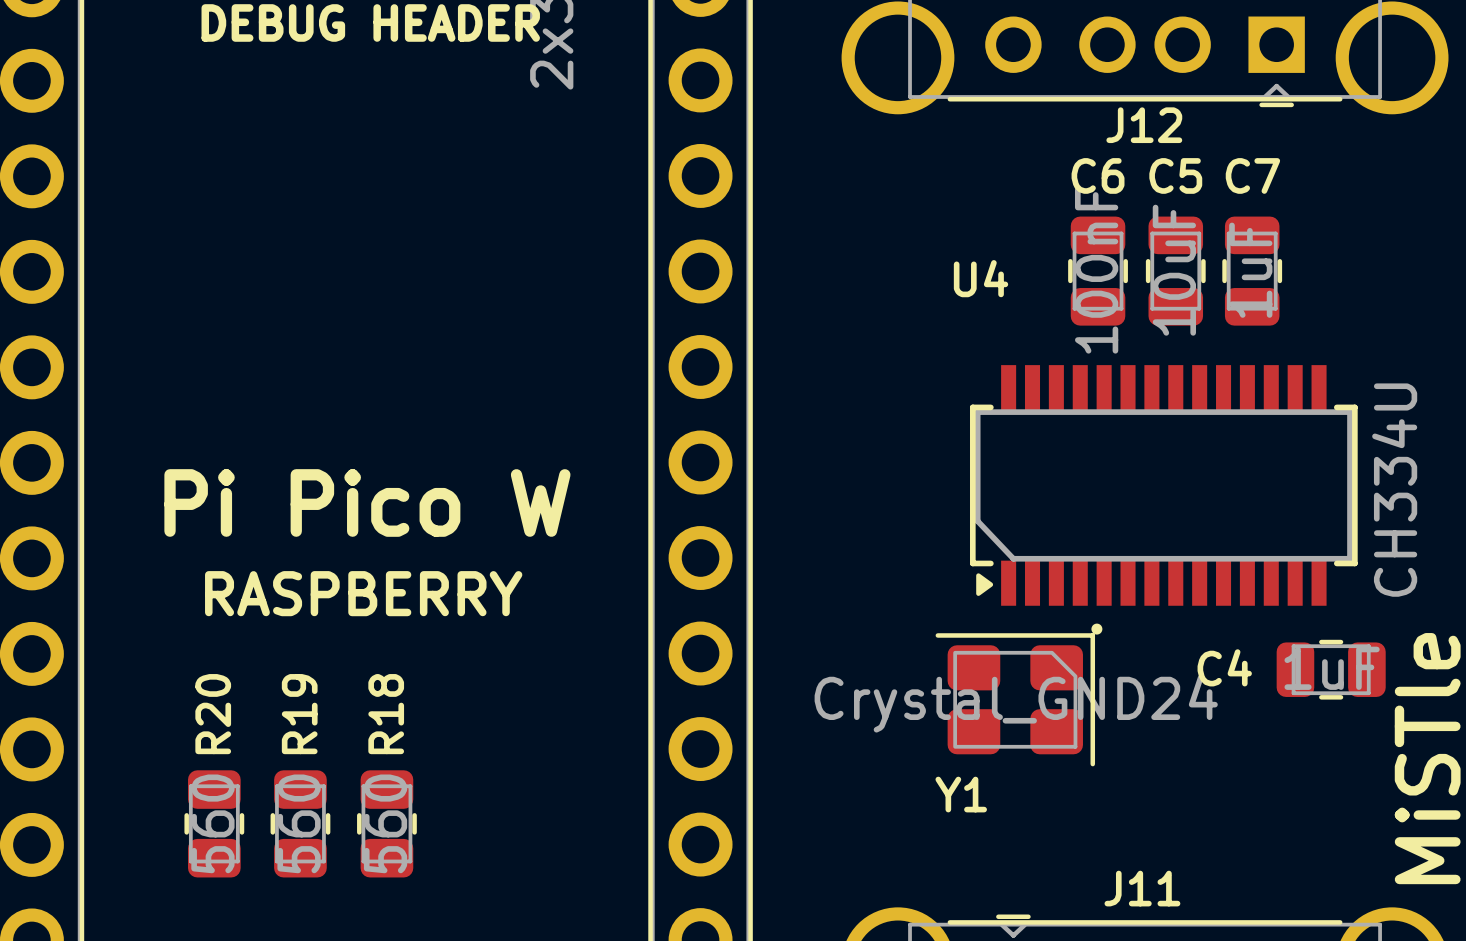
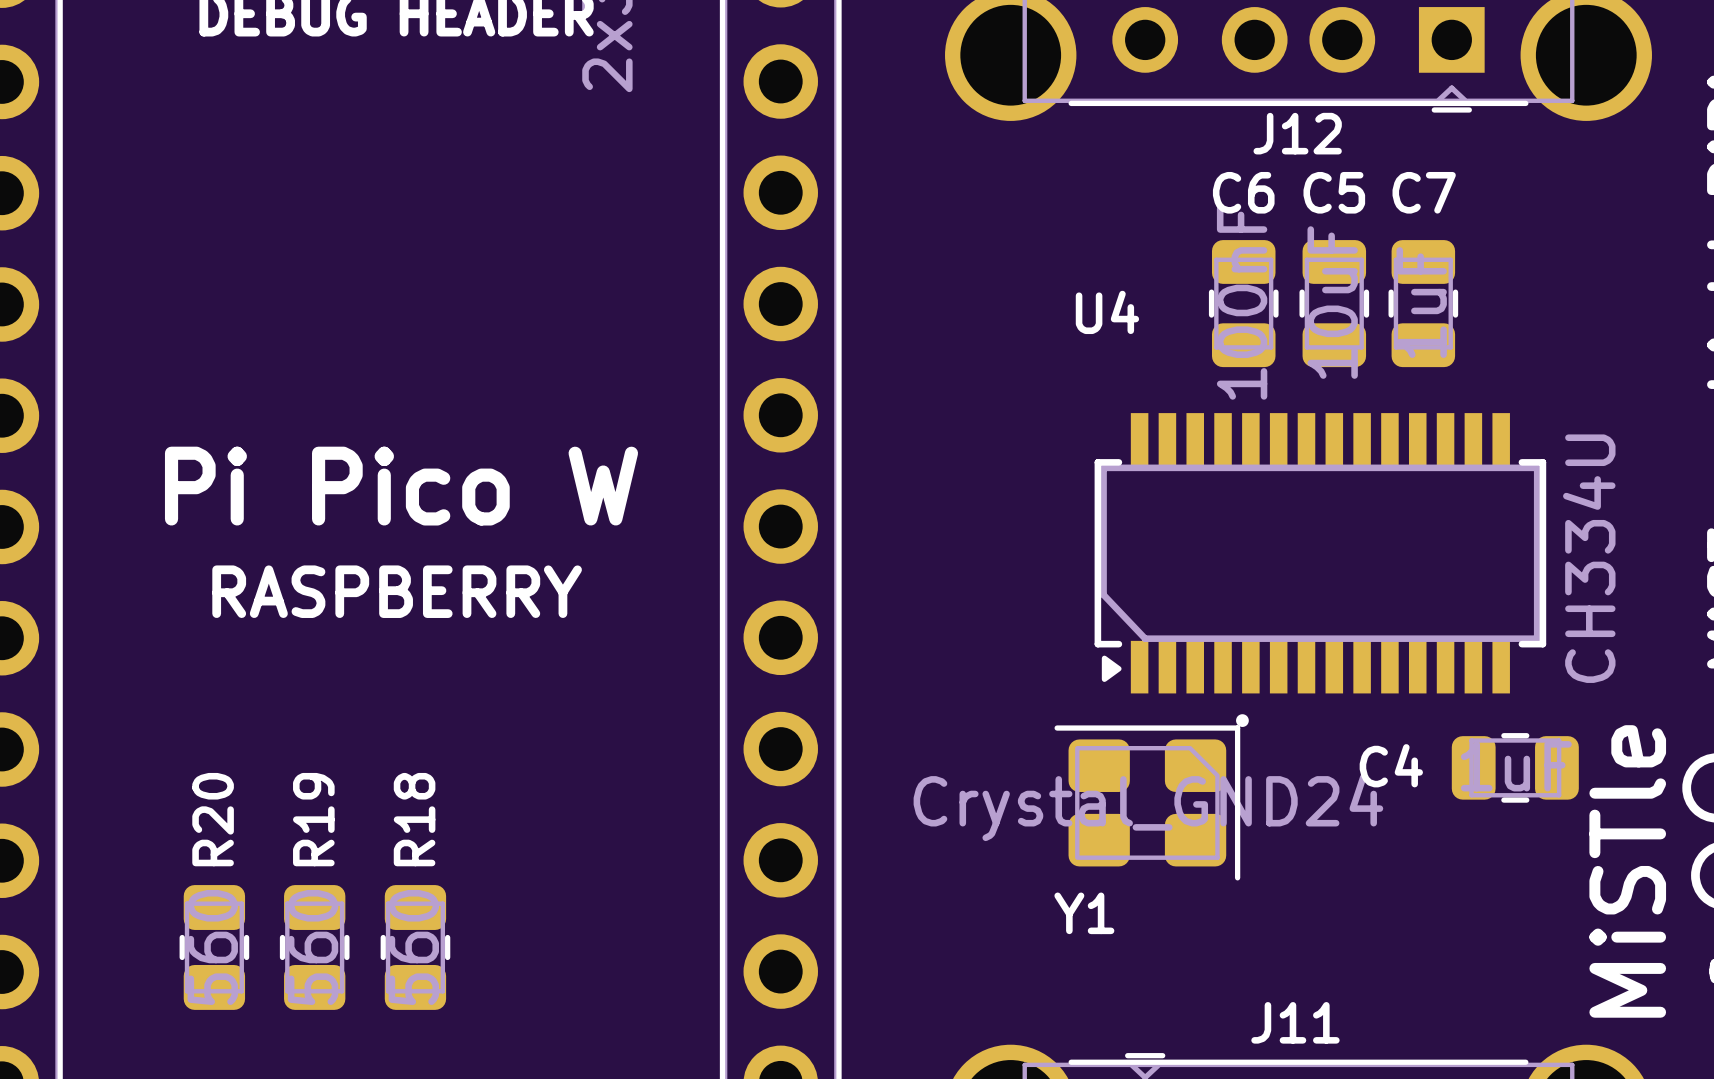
text: none -> Pi Pico W (401, 486)
text: Pi Pico W (367, 502) -> RASPBERRY (397, 591)
text: RASPBERRY (363, 593) -> none

